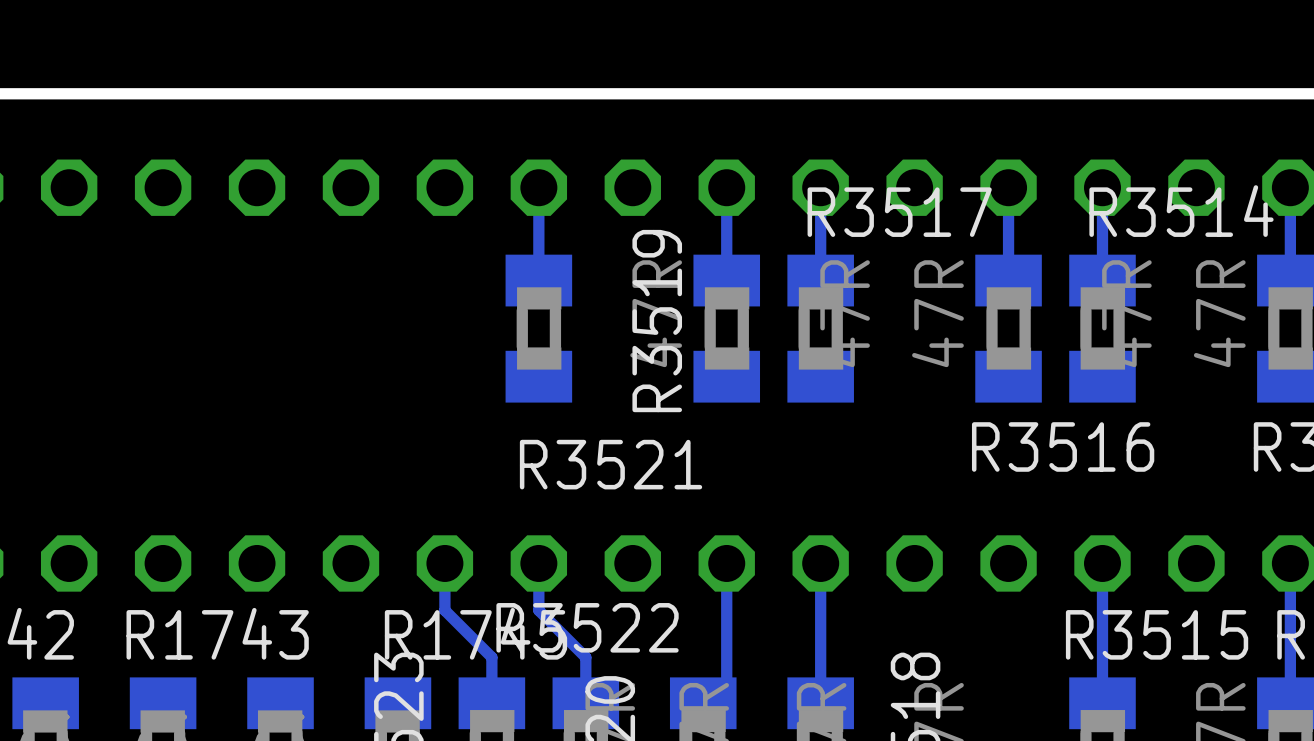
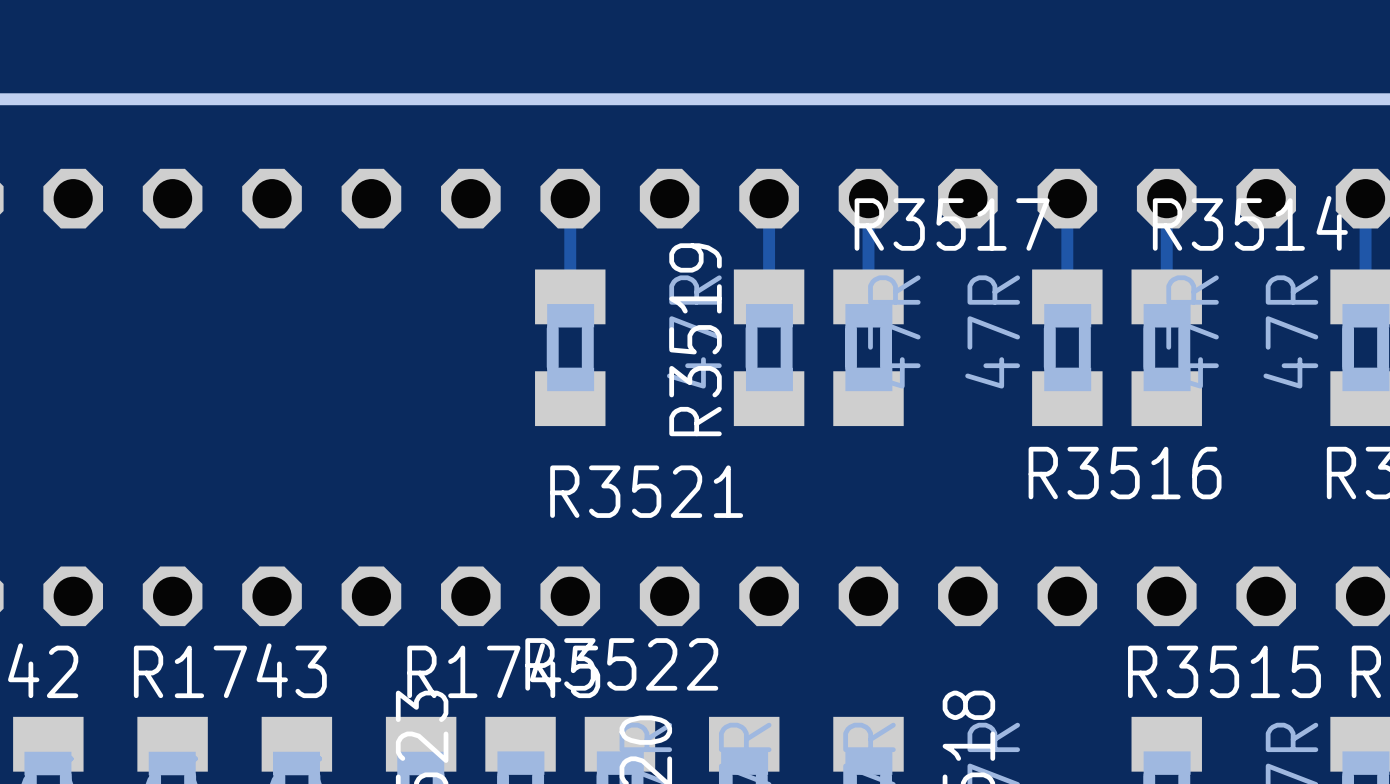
track: (444, 563) (444, 610) (491, 657) (491, 703) -> none
track: (538, 563) (538, 610) (585, 657) (585, 703) -> none
track: (726, 563) (726, 703) (703, 703) -> none
track: (820, 563) (820, 703) -> none
track: (1102, 563) (1102, 703) -> none
track: (1290, 563) (1290, 703) -> none

